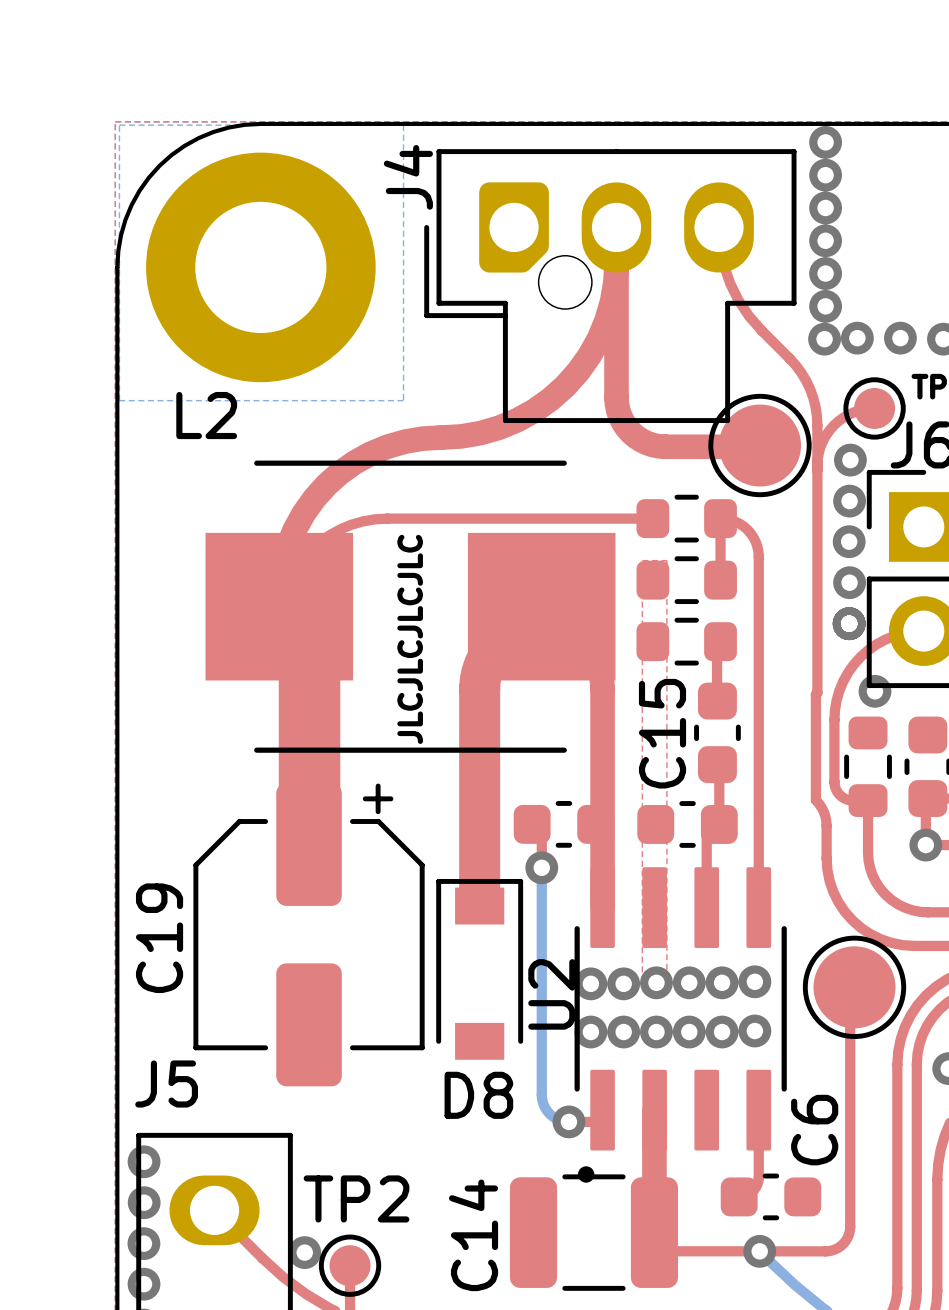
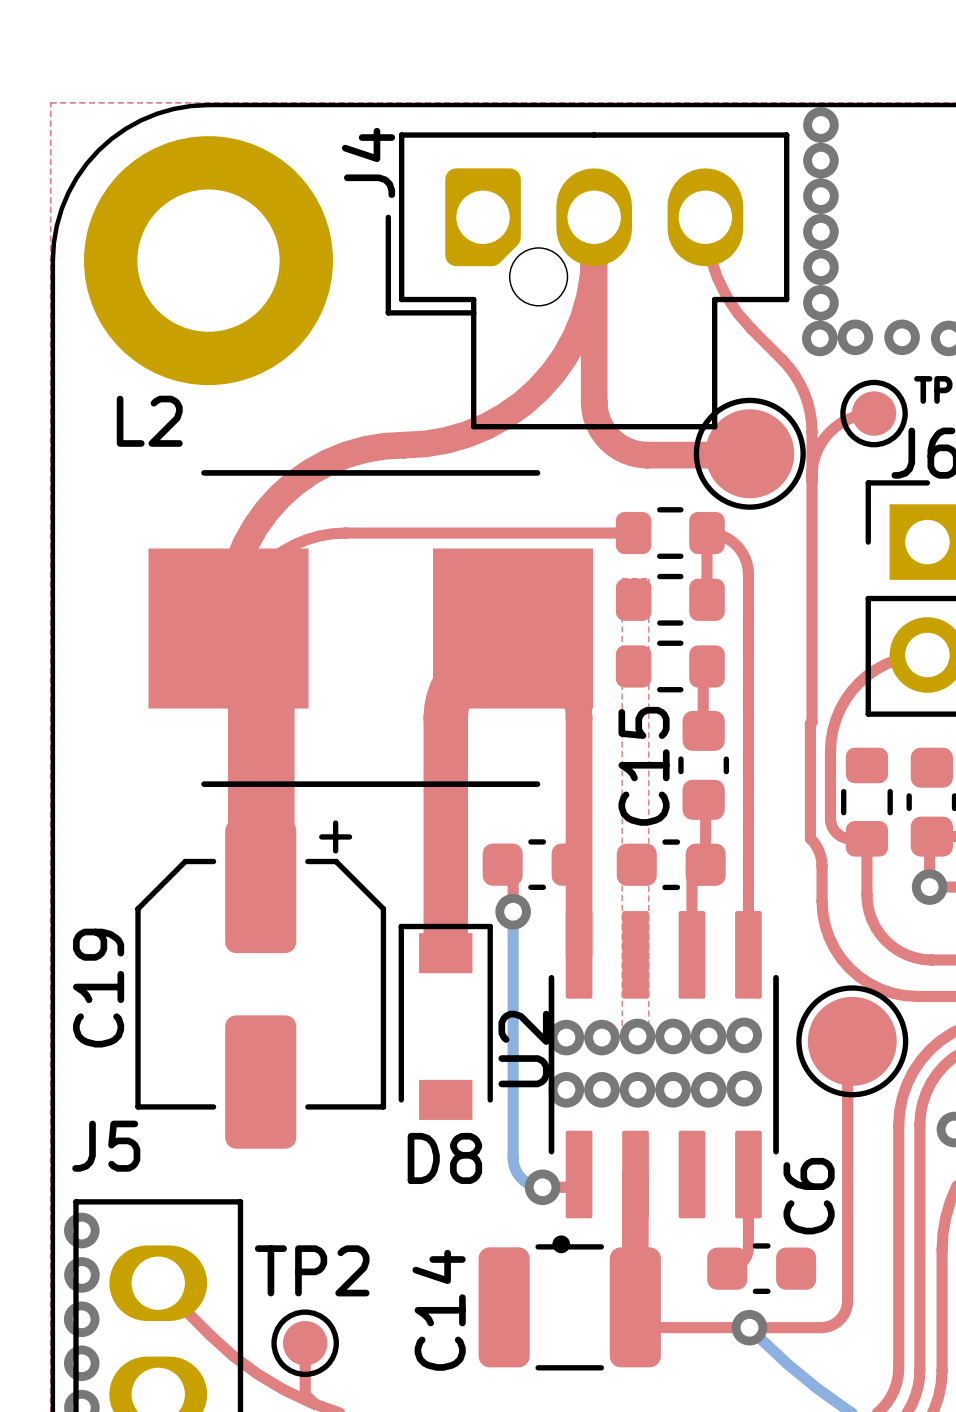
bottom zone outline: (119, 125) (119, 400) (403, 400) (403, 125) (119, 125) -> none
via: (850, 460) -> none
via: (849, 501) -> none
via: (849, 541) -> none
via: (849, 582) -> none
via: (849, 623) -> none
text: JLCJLCJLCJLC (410, 639) -> none
via: (875, 691) -> none
via: (304, 1252) -> none

